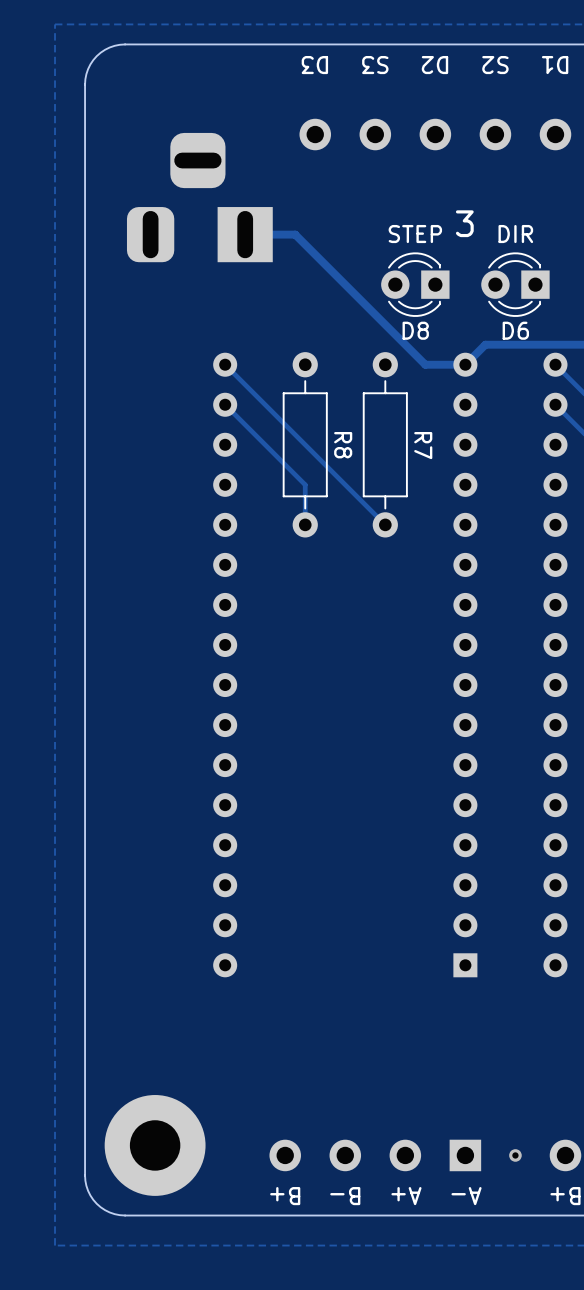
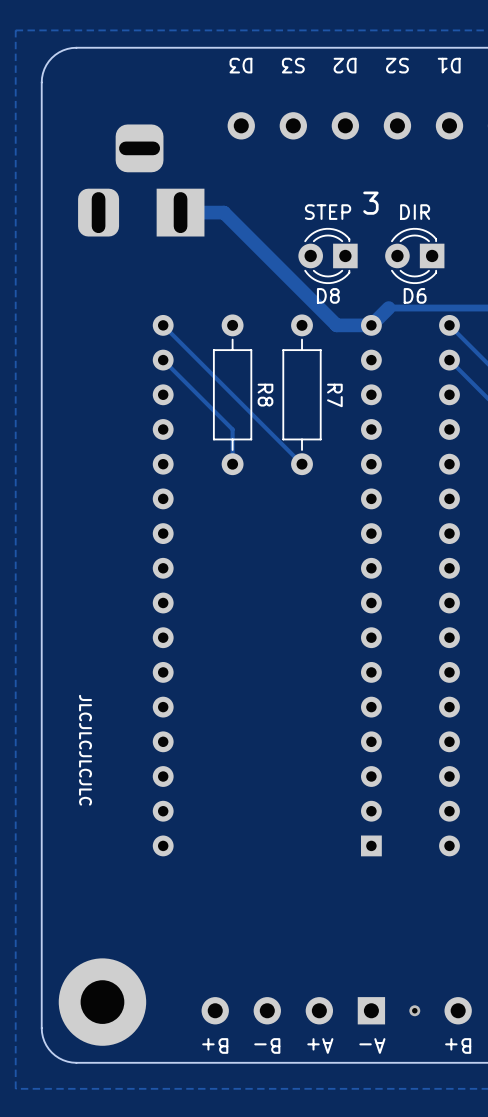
track width: thin (245, 234) (295, 234) (425, 364) (465, 364) (485, 344) -> thick (180, 212) (223, 212) (336, 325) (371, 325) (388, 308)
text: none -> JLCJLCJLCJLC (85, 750)

